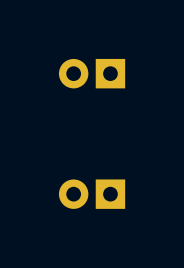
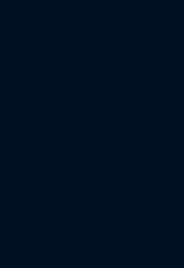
part: (92, 73) -> none
part: (92, 194) -> none

